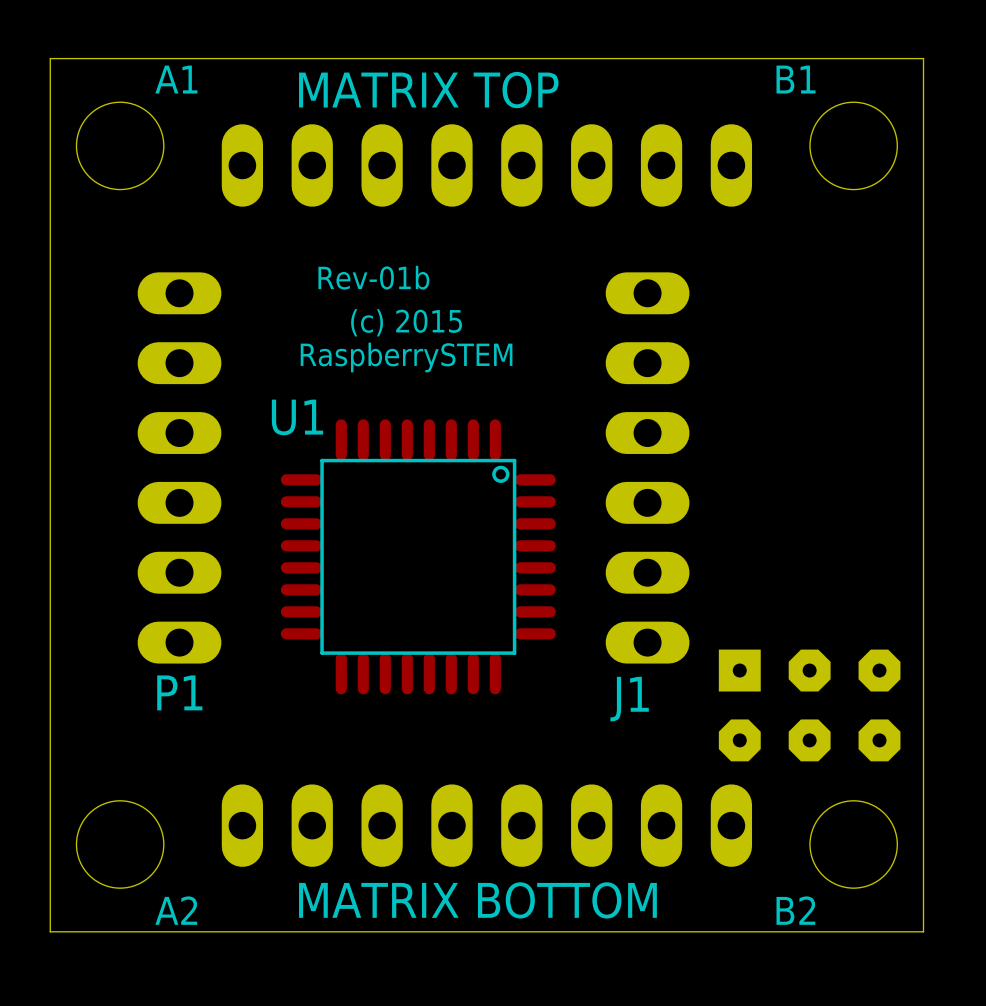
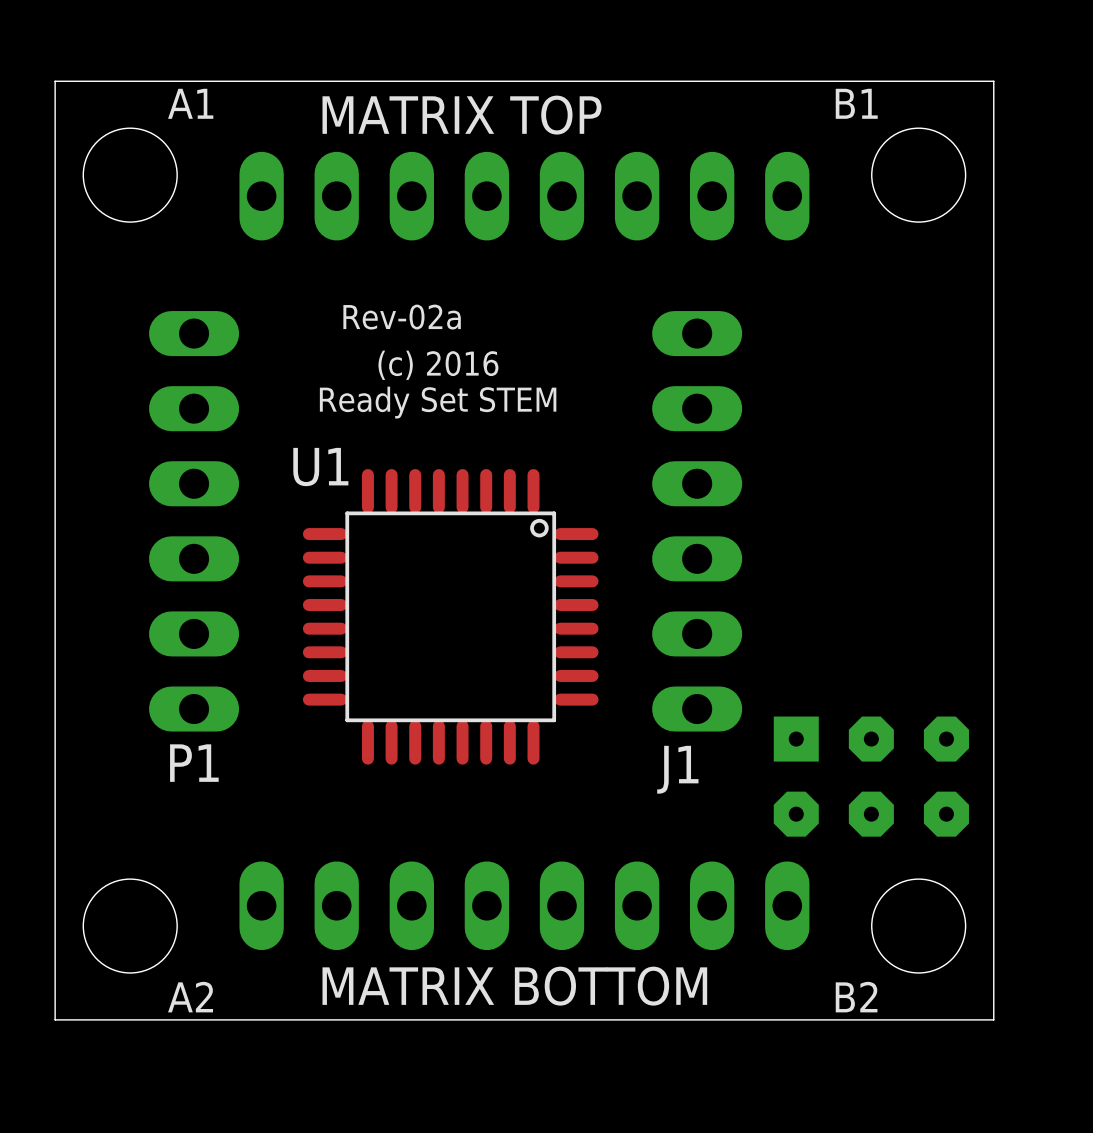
text: Rev-01b (373, 277) -> Rev-02a (402, 317)
text: (c) 2015 (406, 322) -> (c) 2016 (438, 365)
text: RaspberrySTEM (406, 357) -> Ready Set STEM (438, 402)

